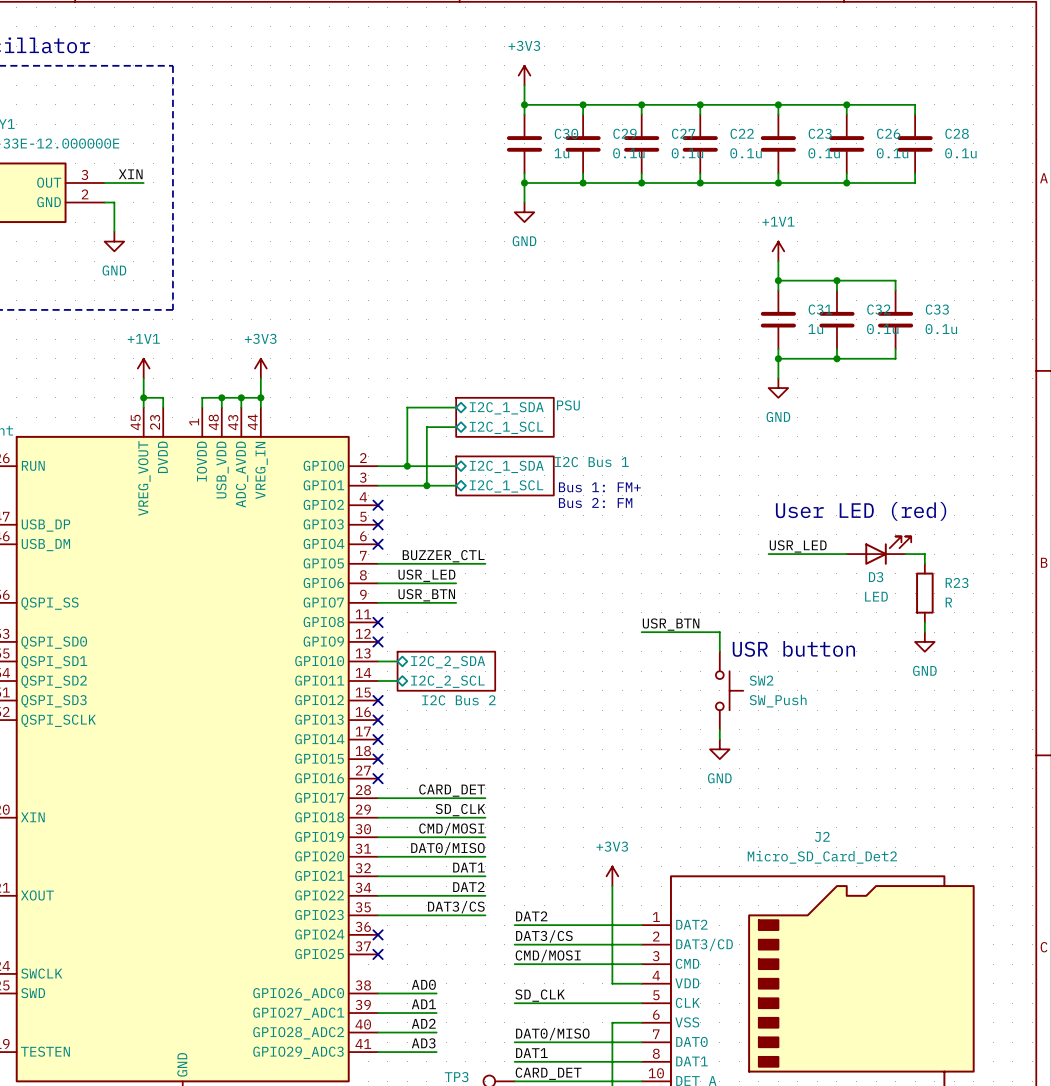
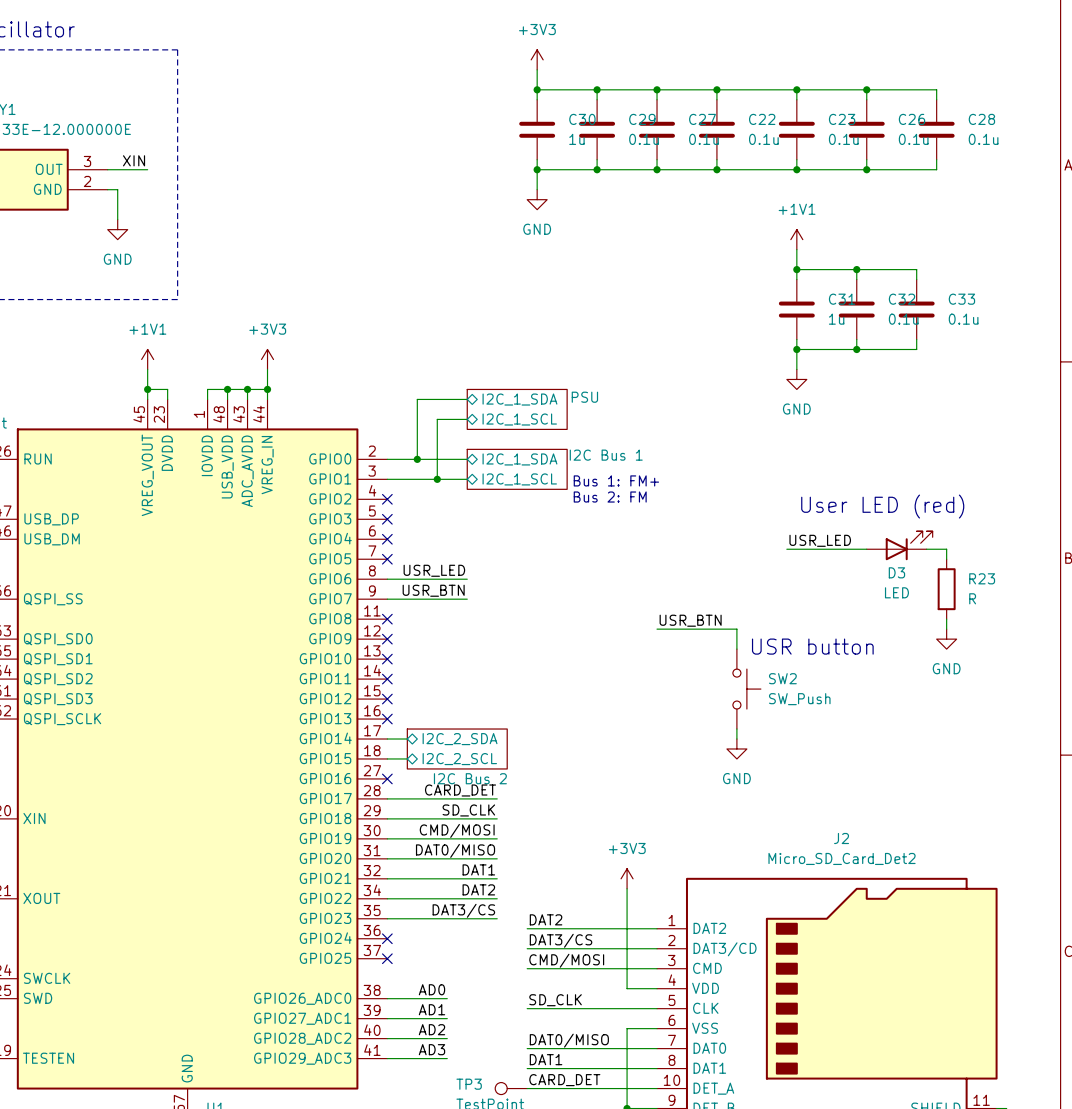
label: BUZZER_CTL (443, 556) -> none
wire: (378, 563) (485, 563) -> none
no-connect mark: none -> (387, 559)
wire: (378, 661) (397, 661) -> (387, 758) (407, 758)
no-connect mark: none -> (387, 659)
sheet pin position: I2C_2_SDA (448, 662) -> I2C_2_SDA (460, 739)
sheet I2C Bus 2 position: (446, 671) -> (457, 748)
wire: (378, 681) (397, 681) -> (387, 739) (407, 739)
no-connect mark: none -> (387, 679)
sheet pin position: I2C_2_SCL (447, 681) -> I2C_2_SCL (459, 759)
no-connect mark: (378, 739) -> none
no-connect mark: (378, 759) -> none

